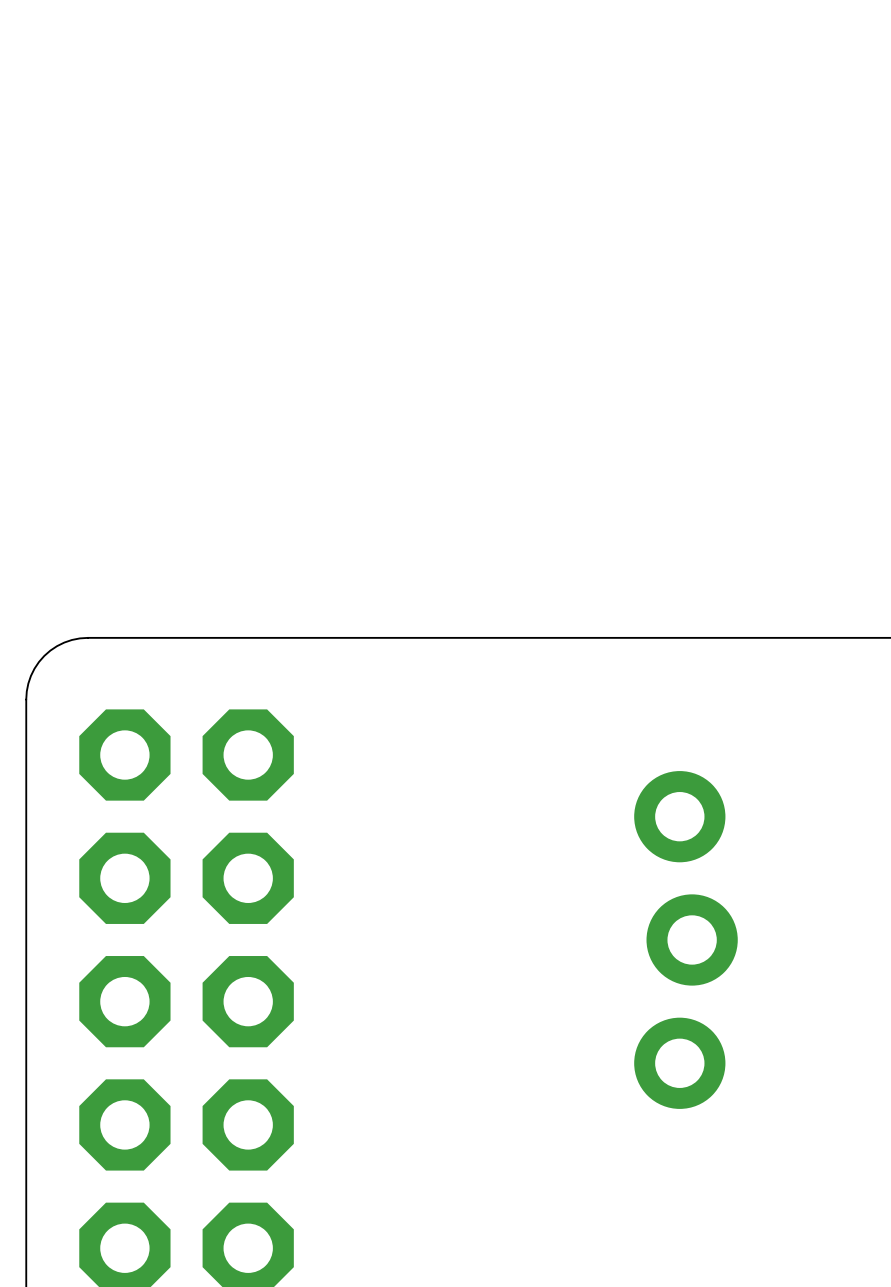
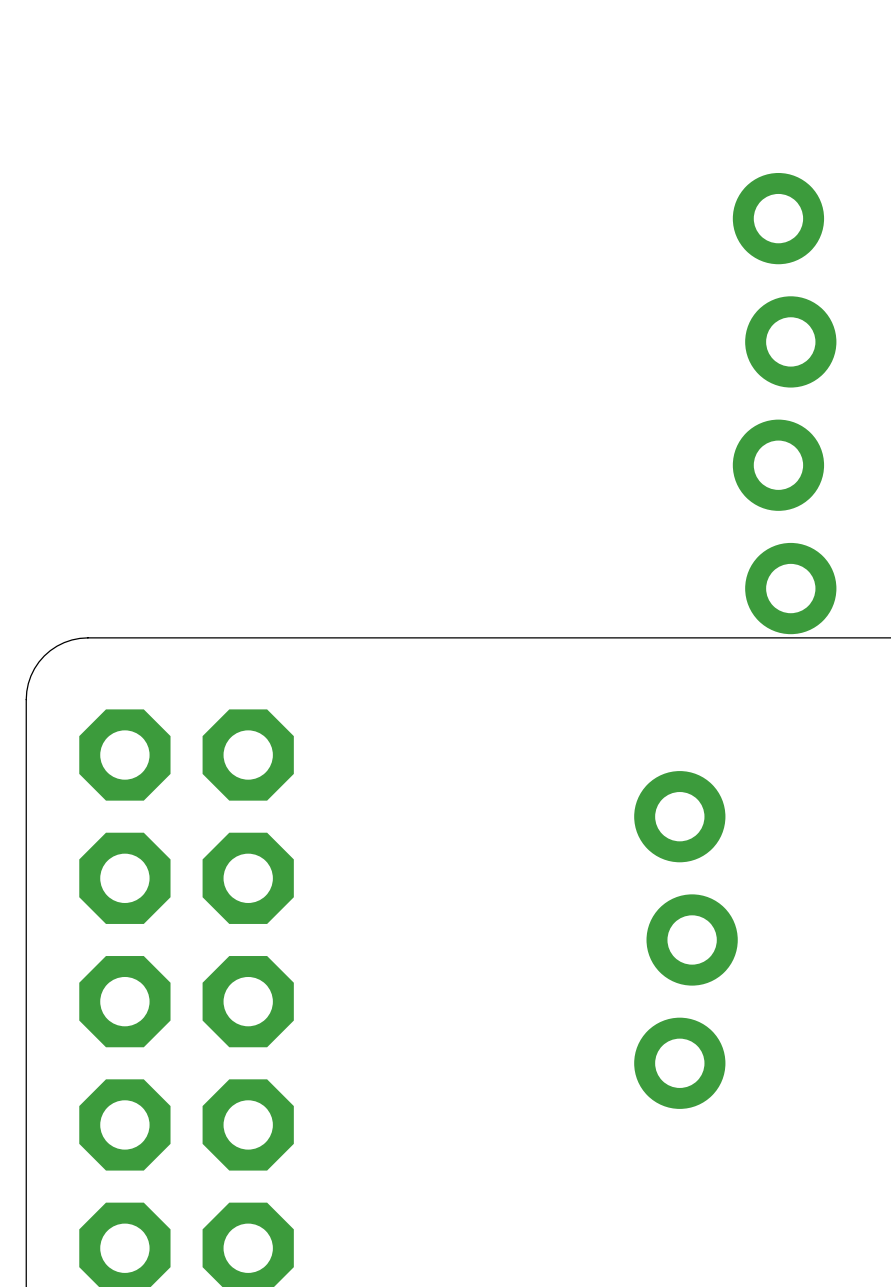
part: none -> (784, 403)

